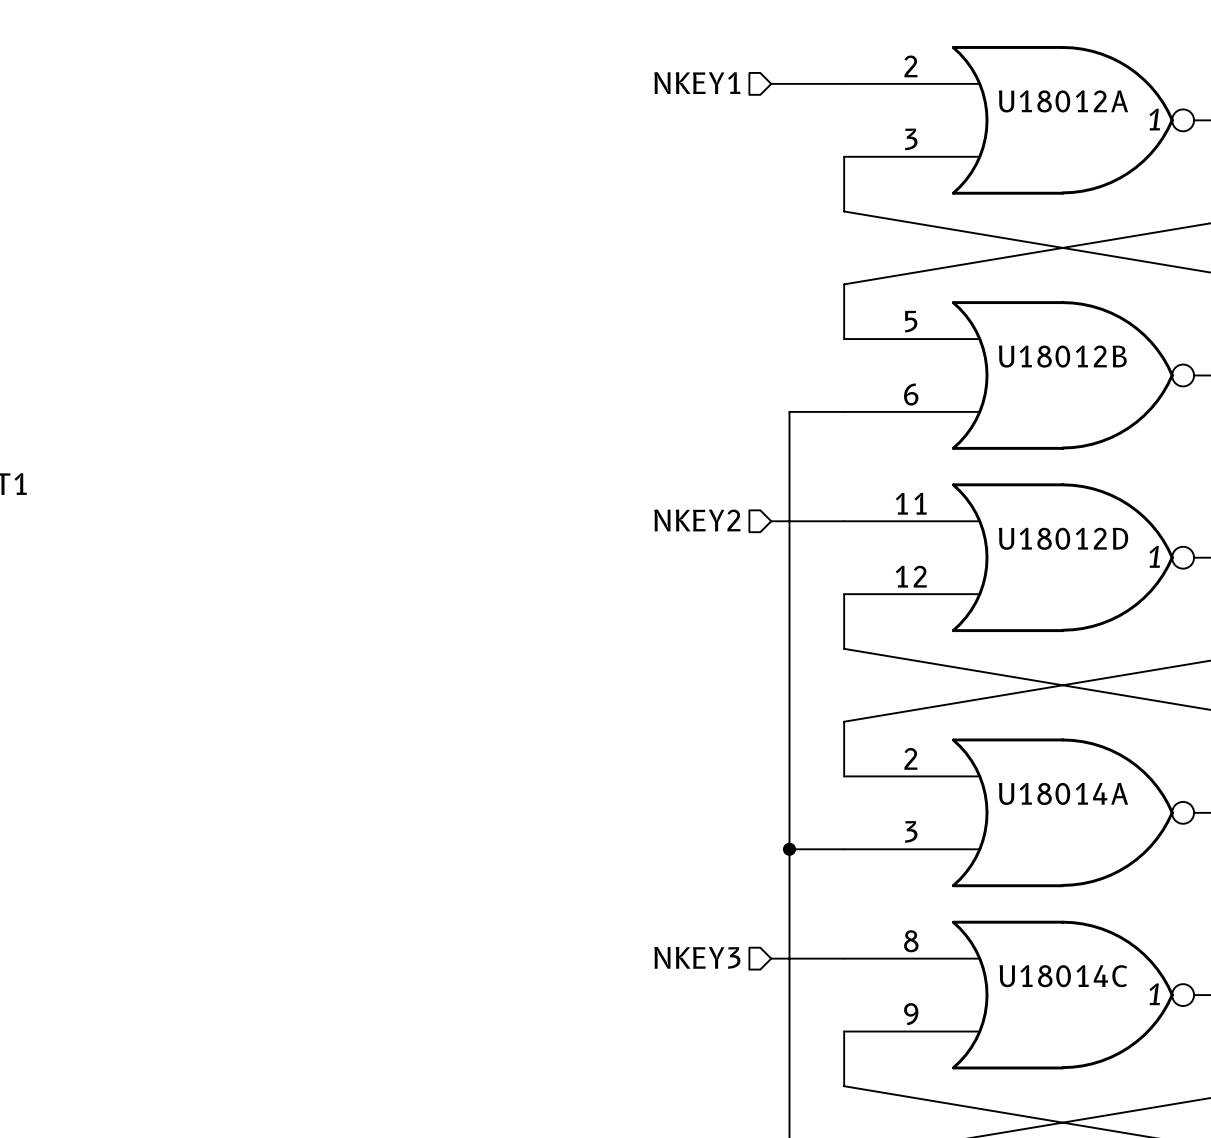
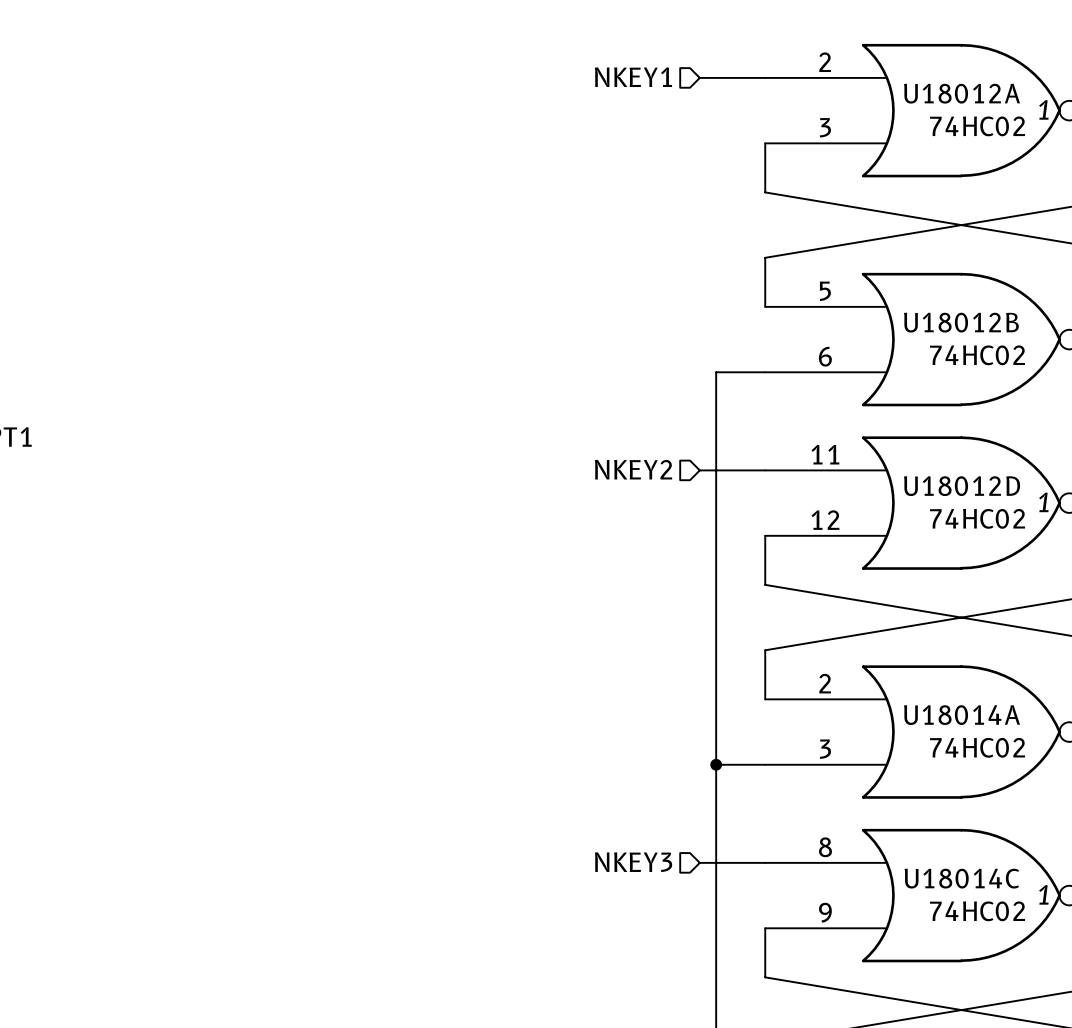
U18012A value: none -> 74HC02 (977, 126)
U18012B value: none -> 74HC02 (977, 355)
U18012D value: none -> 74HC02 (977, 518)
U18014A value: none -> 74HC02 (977, 747)
U18014C value: none -> 74HC02 (977, 911)

